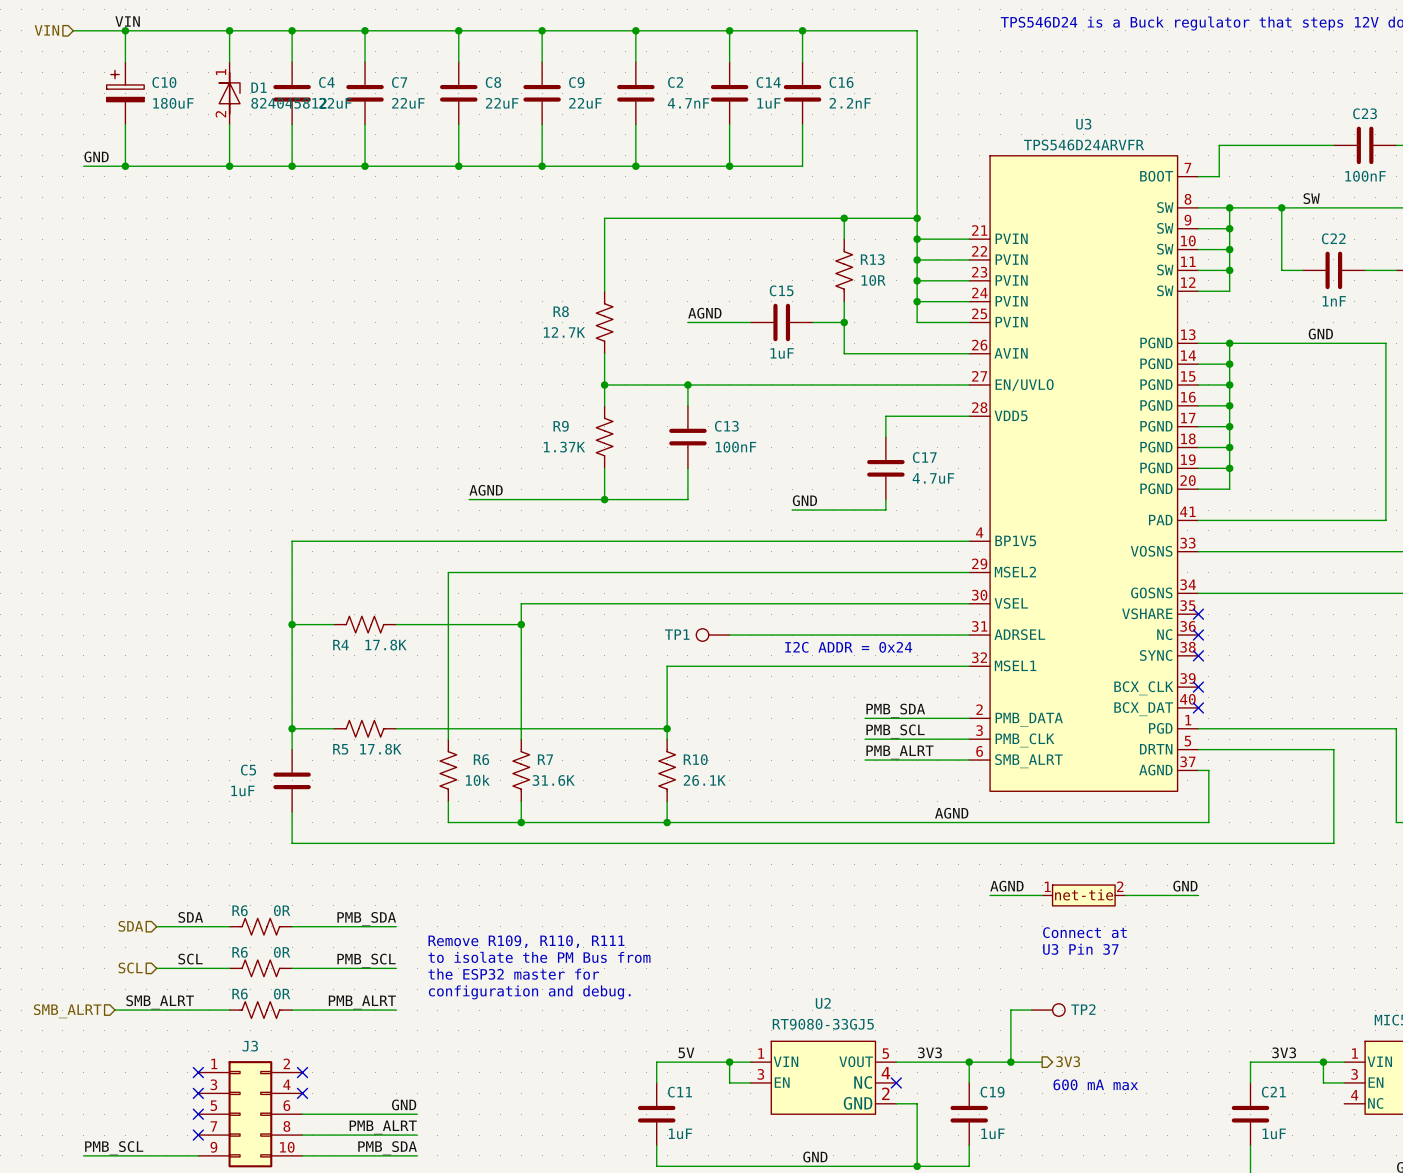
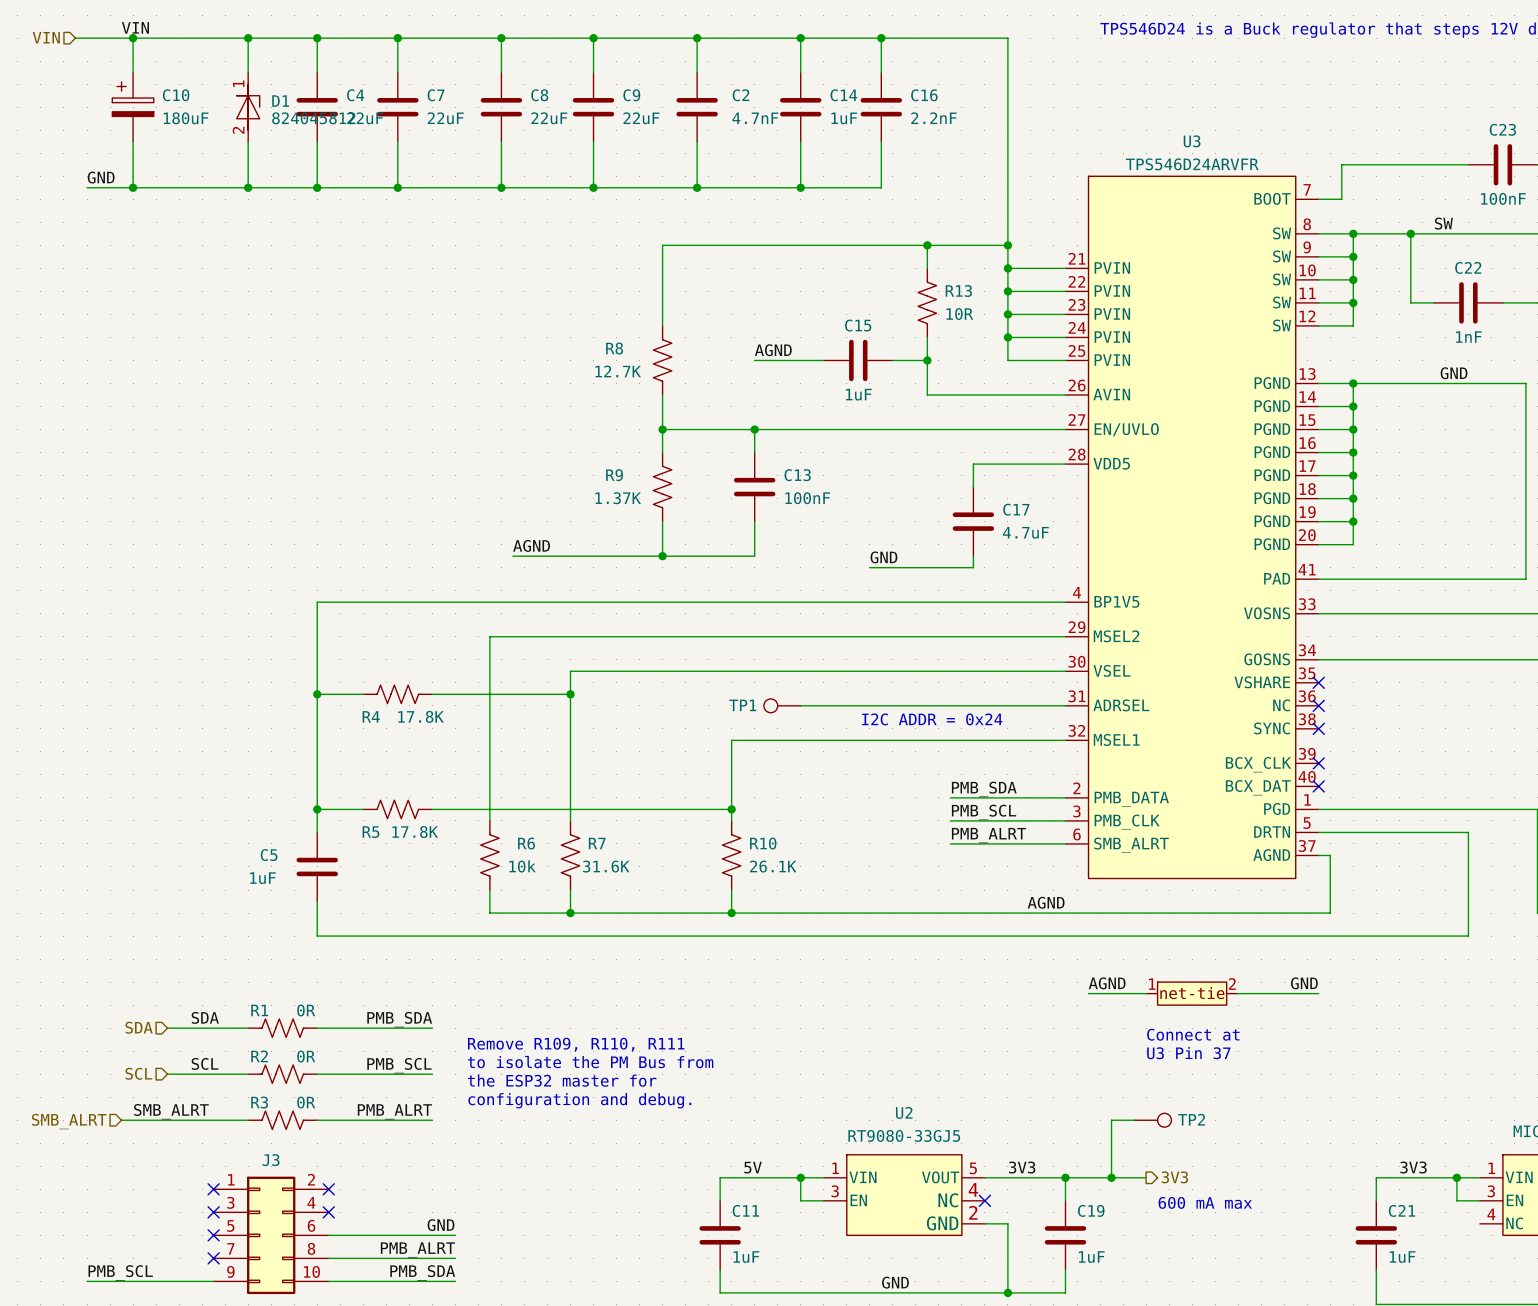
R6 name: R6 (240, 910) -> R1 (259, 1010)
R6 name: R6 (240, 952) -> R2 (259, 1056)
R6 name: R6 (240, 994) -> R3 (259, 1102)

